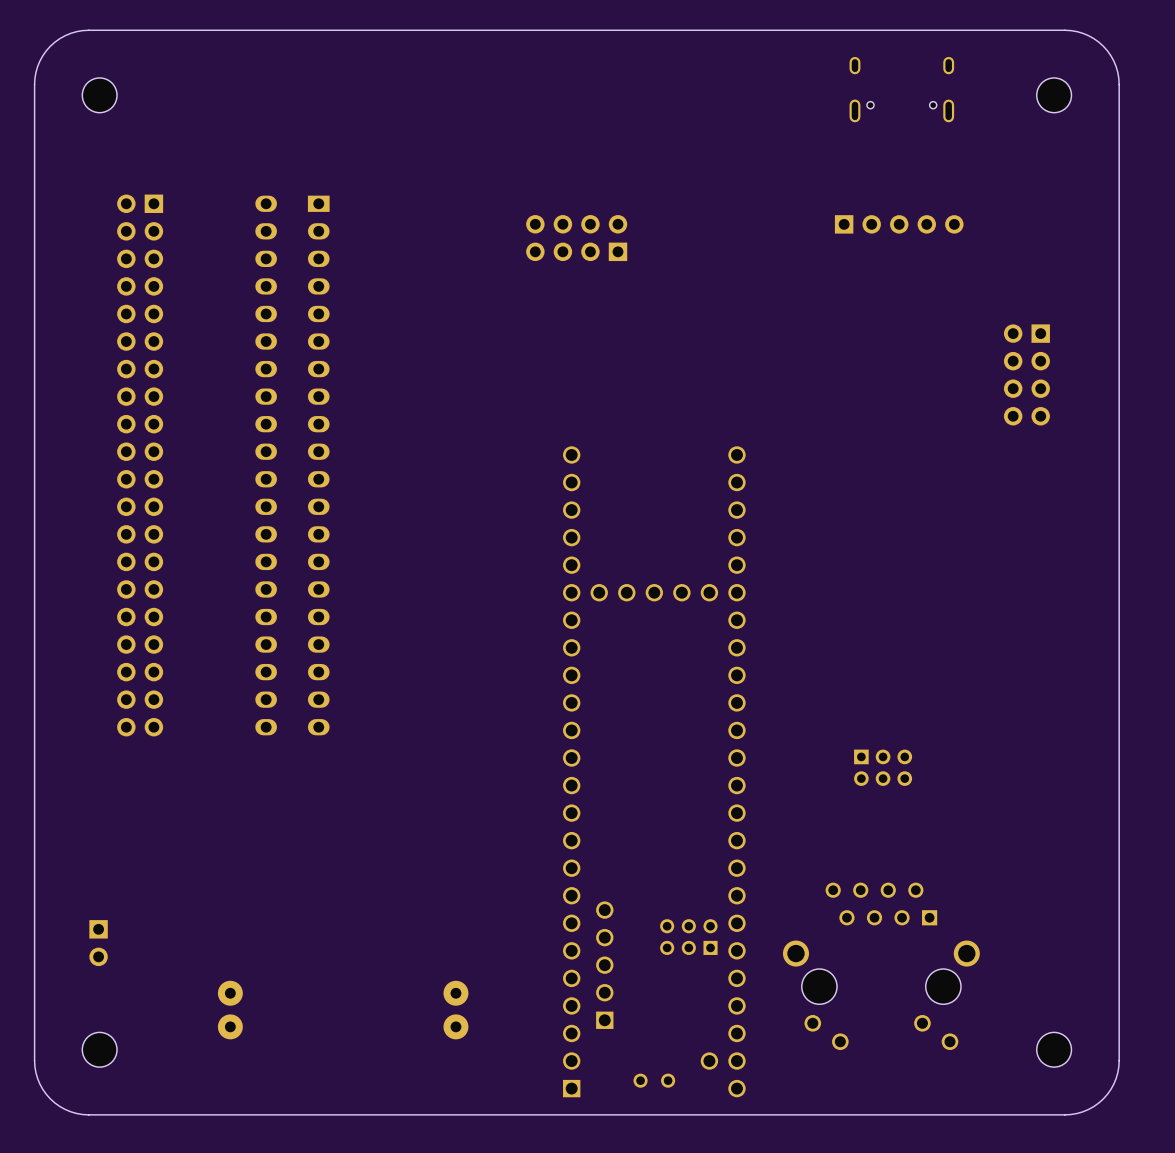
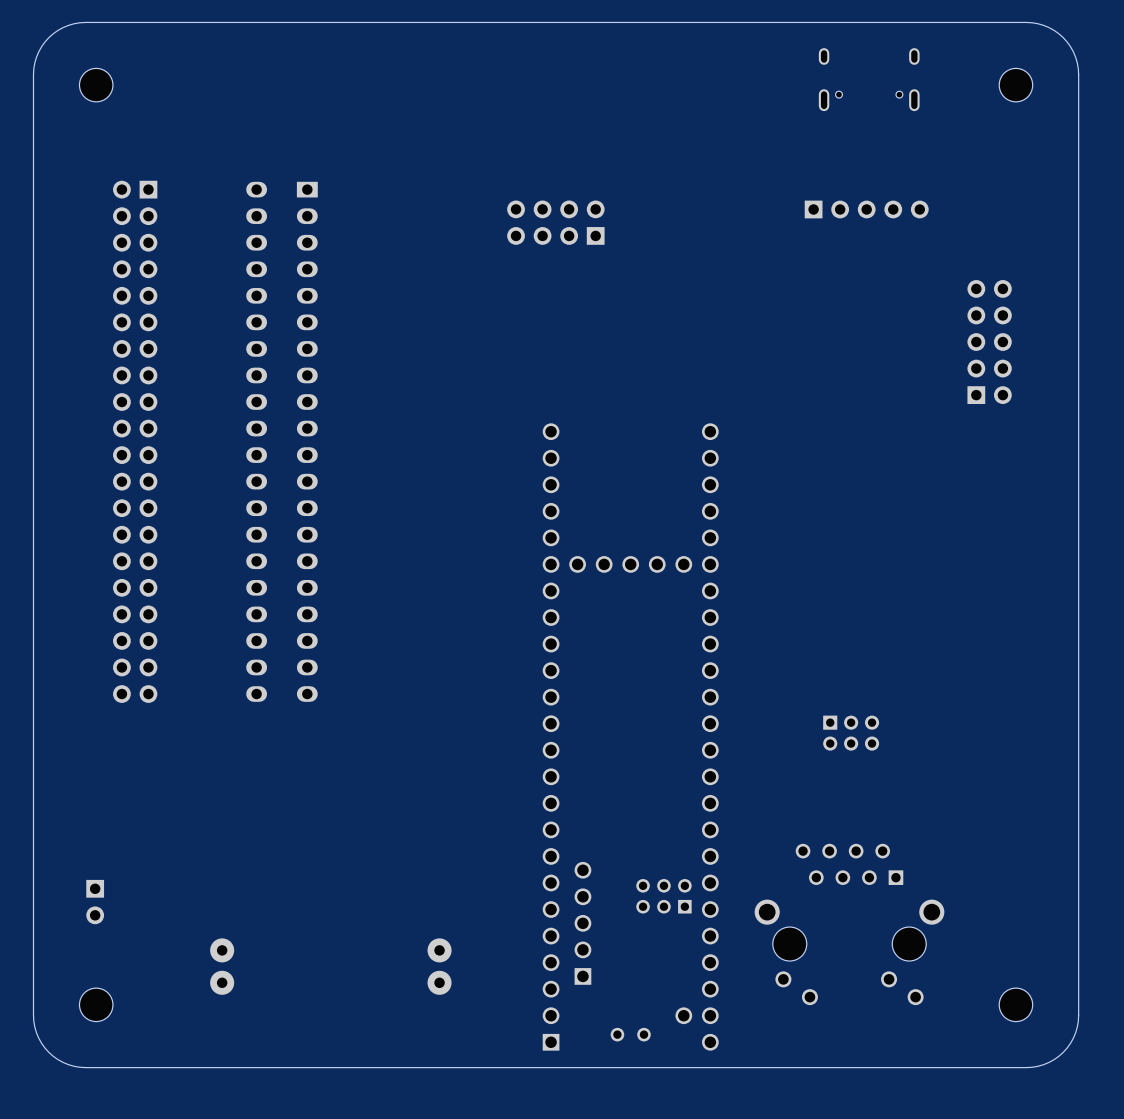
part: none -> (989, 342)
part: (1026, 374) -> none

